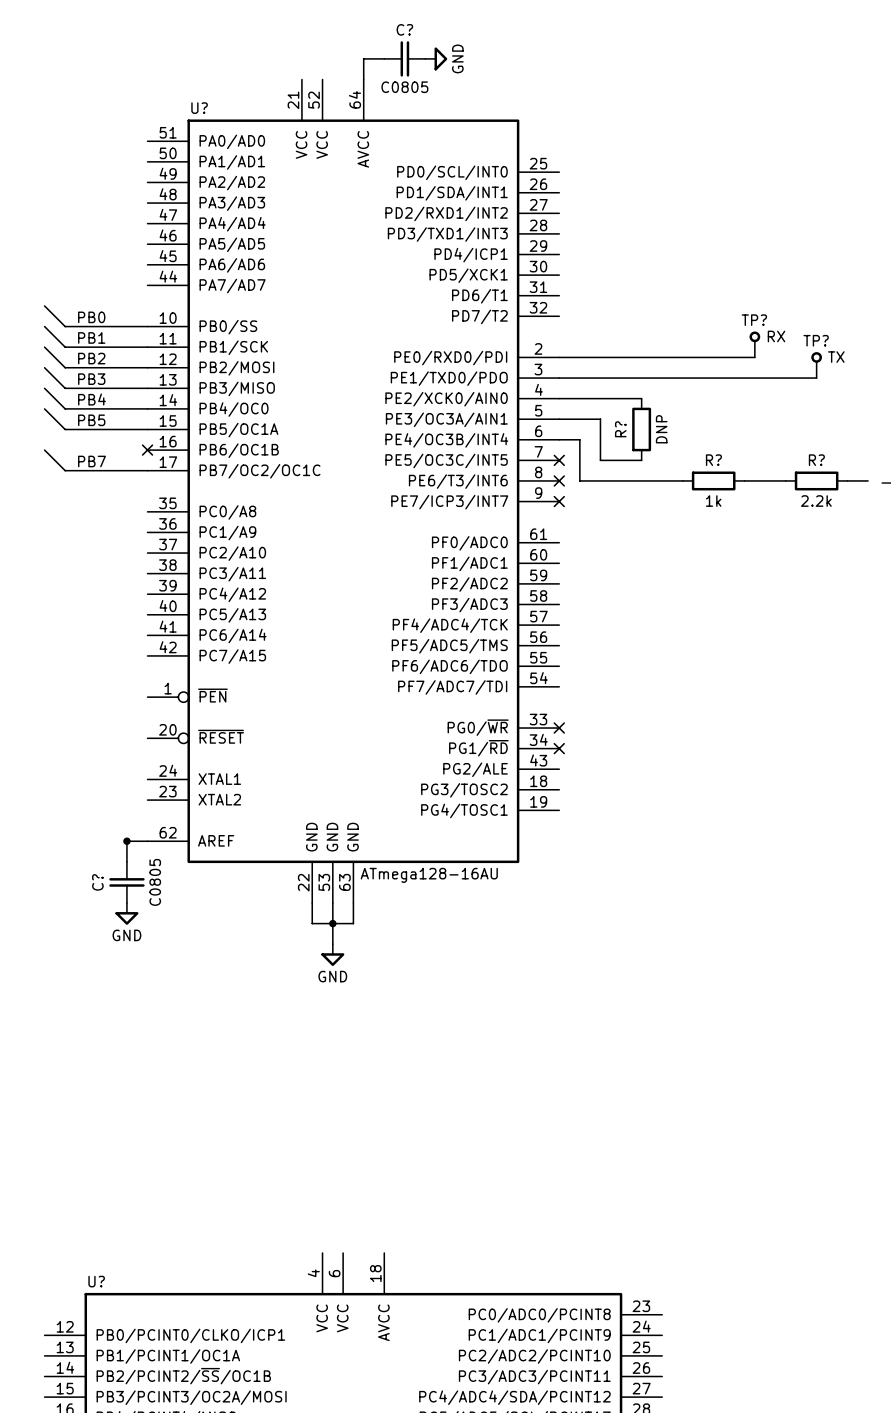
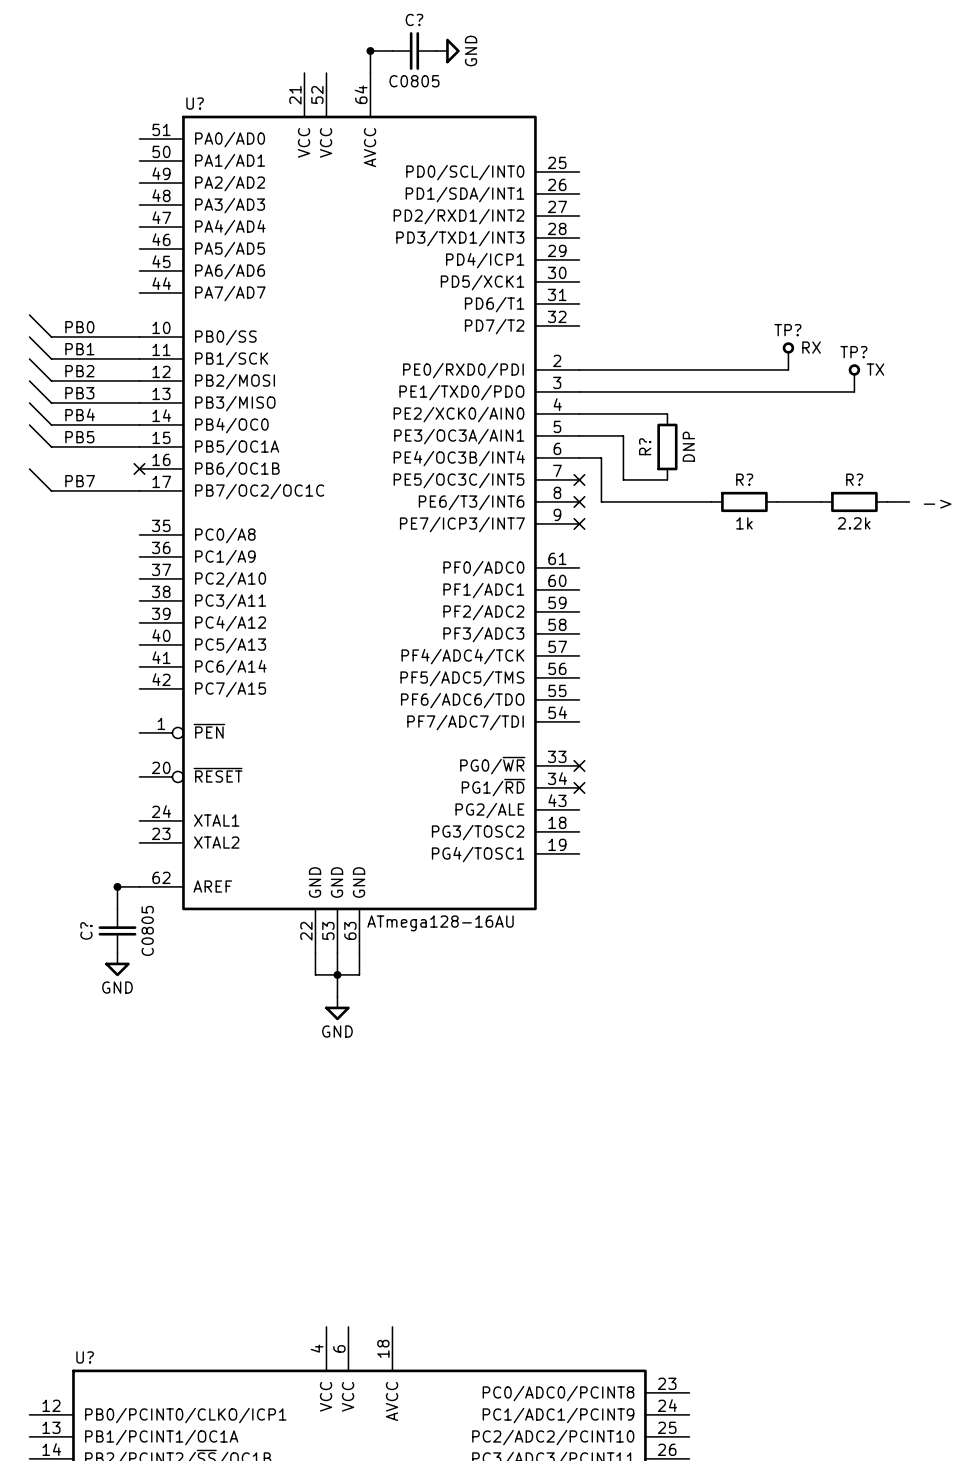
junction: none -> (370, 51)

